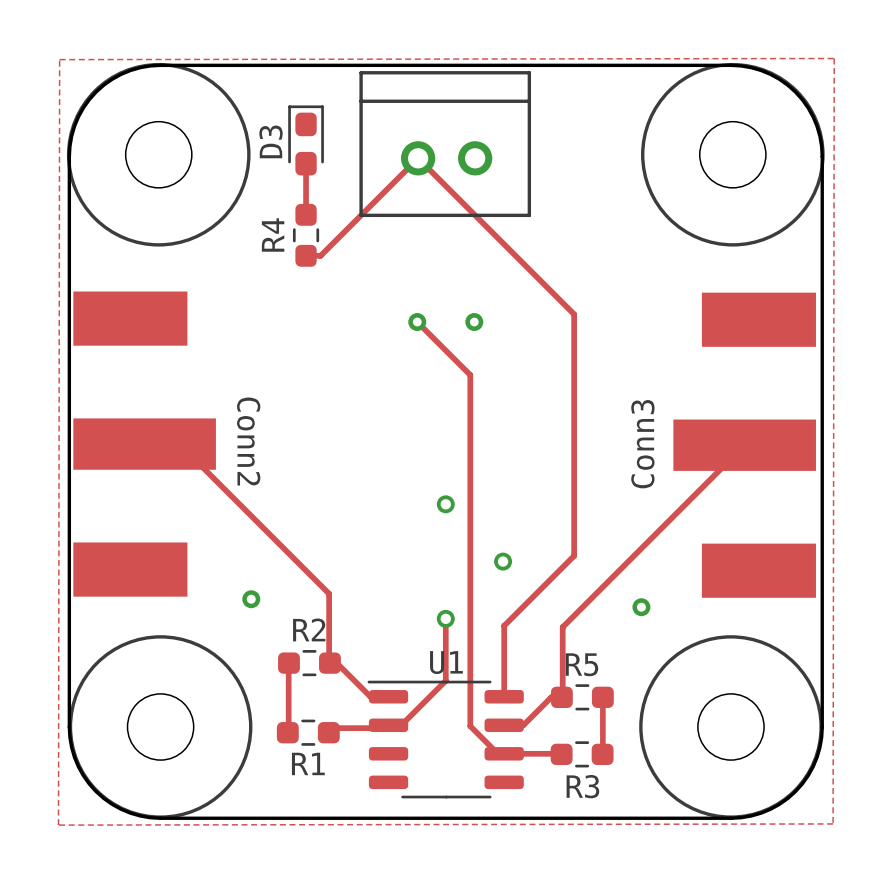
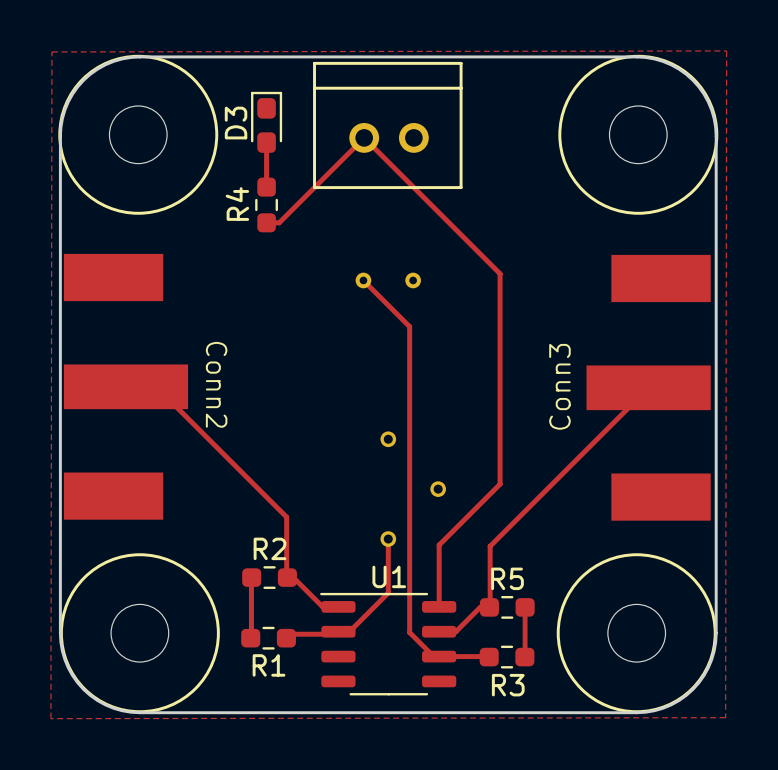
via: (251, 599) -> none
via: (641, 607) -> none

